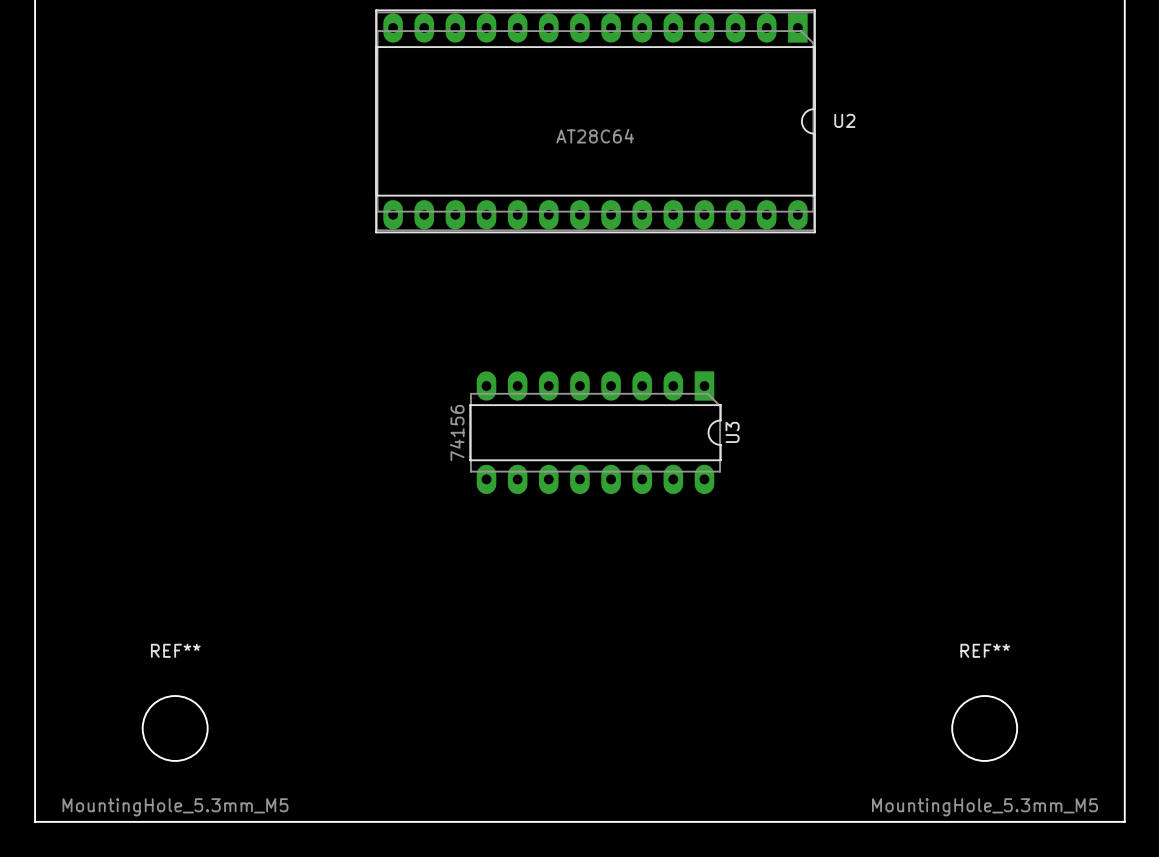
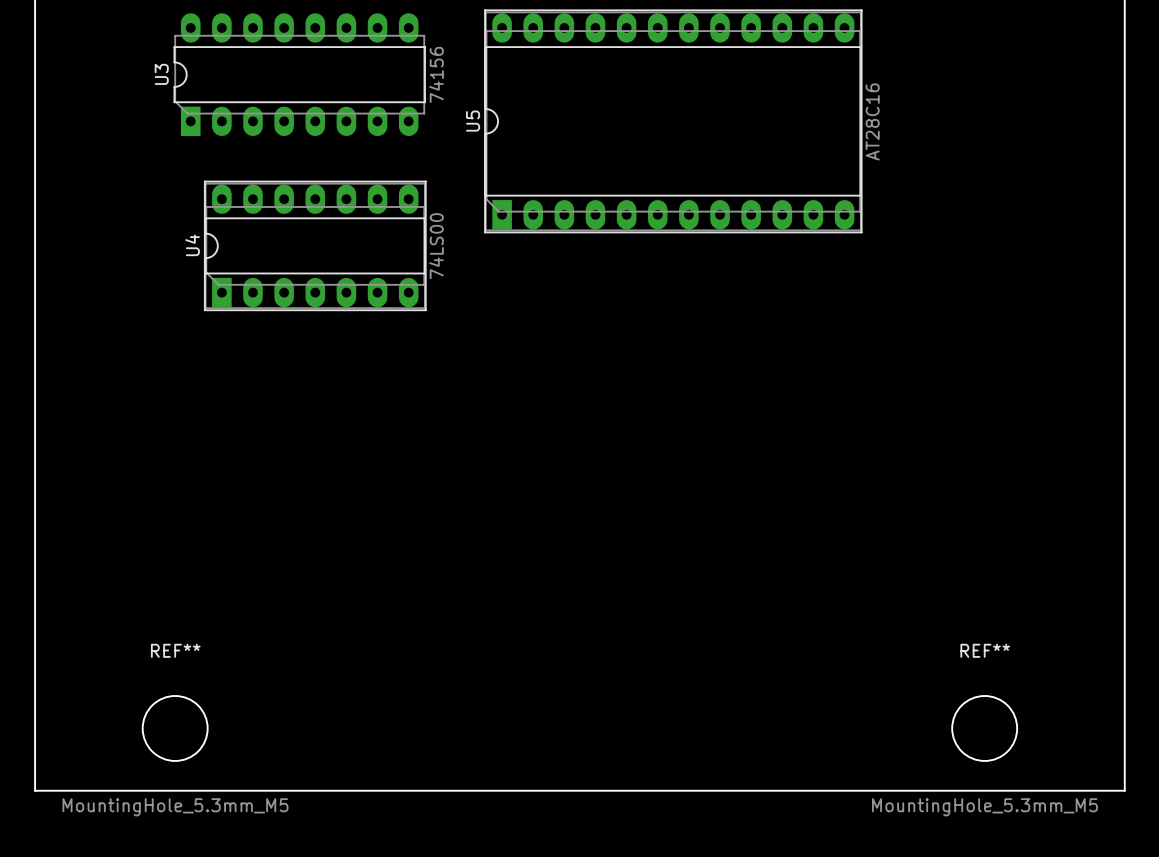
U2: AT28C64 (595, 121) -> none
U5: none -> AT28C16 (673, 121)
U4: none -> 74LS00 (315, 245)
U3 rotation: 0° (595, 432) -> 180° (299, 74)
U3 position: (595, 432) -> (299, 74)
board edge: (35, 790) (35, 821) (1124, 821) (1124, 790) -> (35, 790) (1124, 790)

